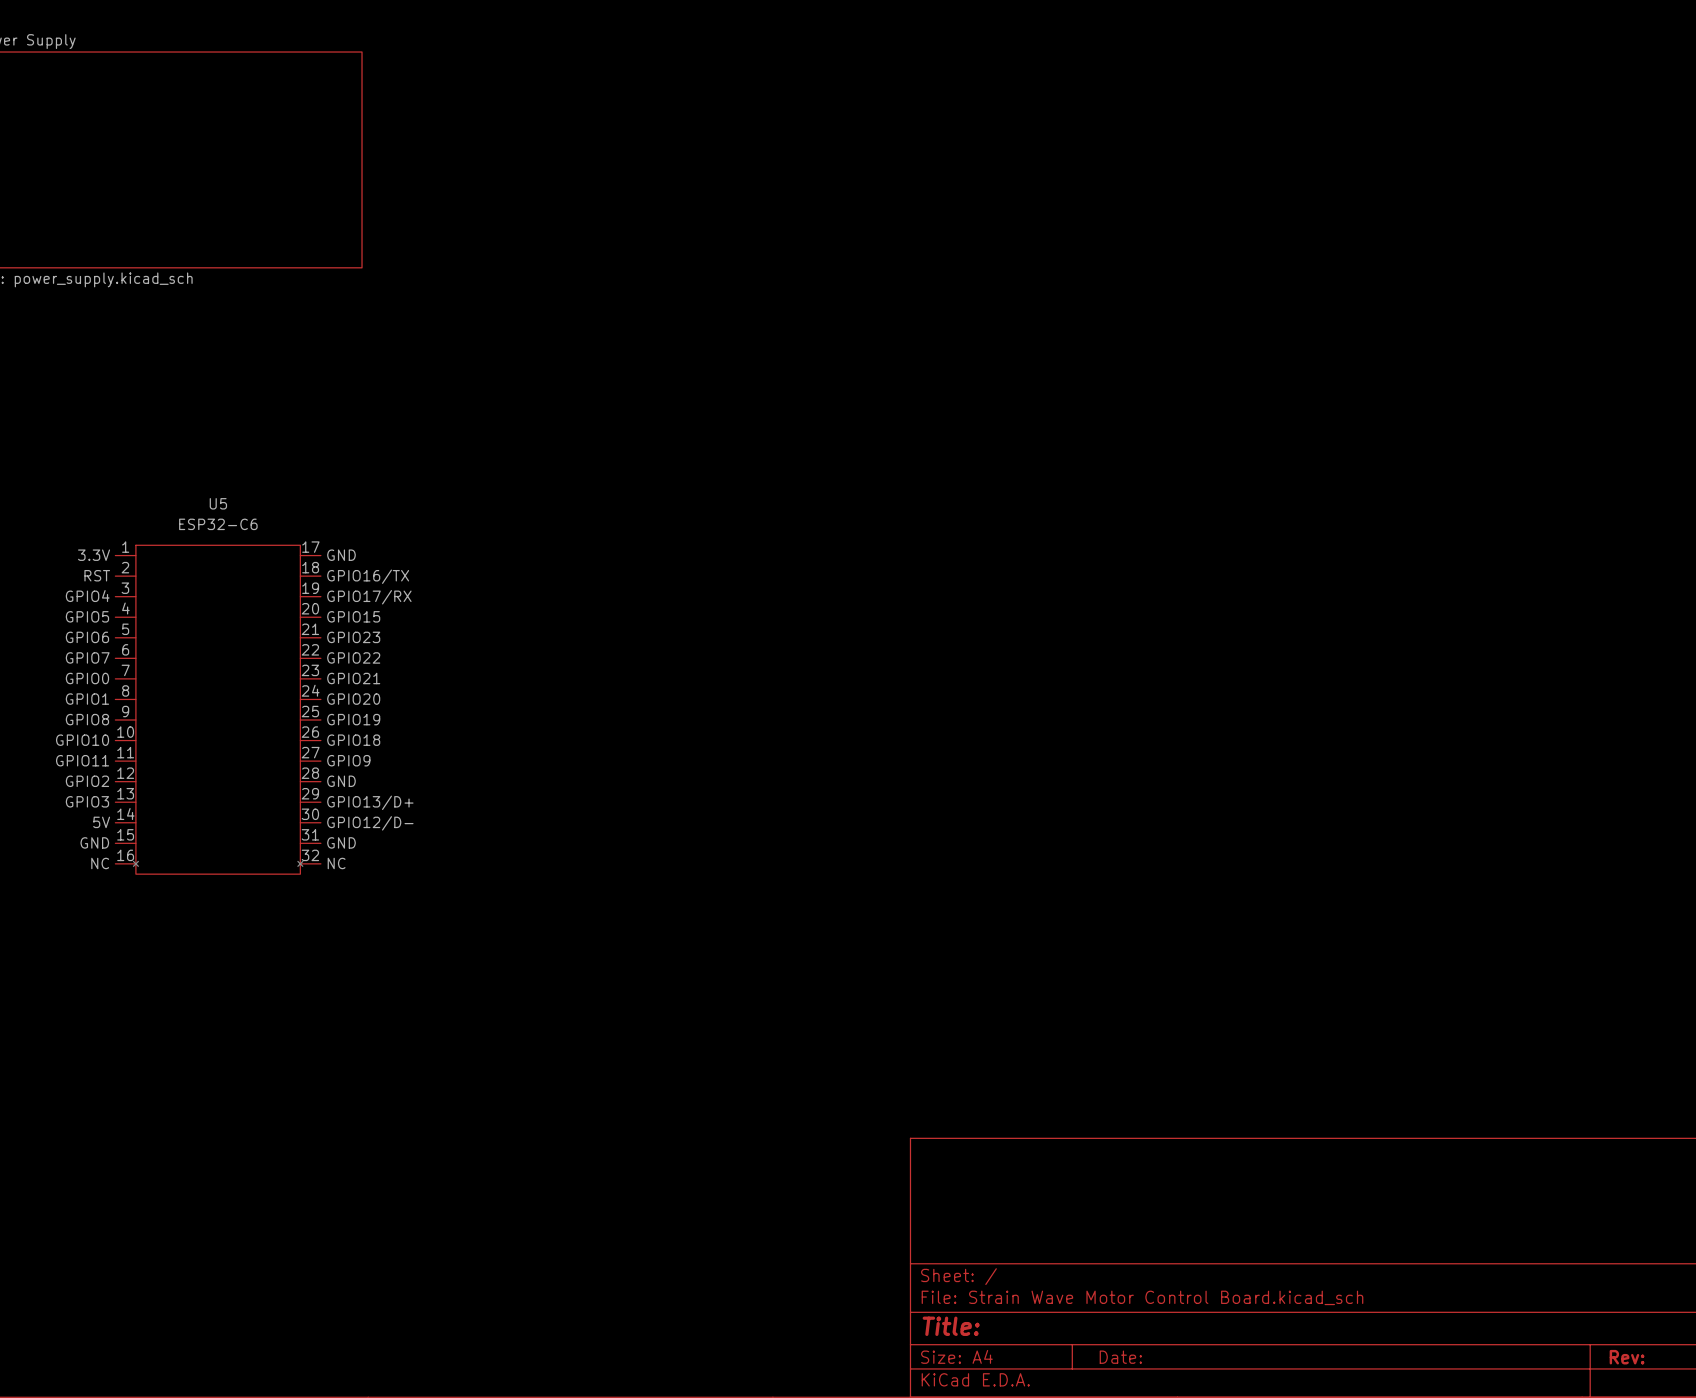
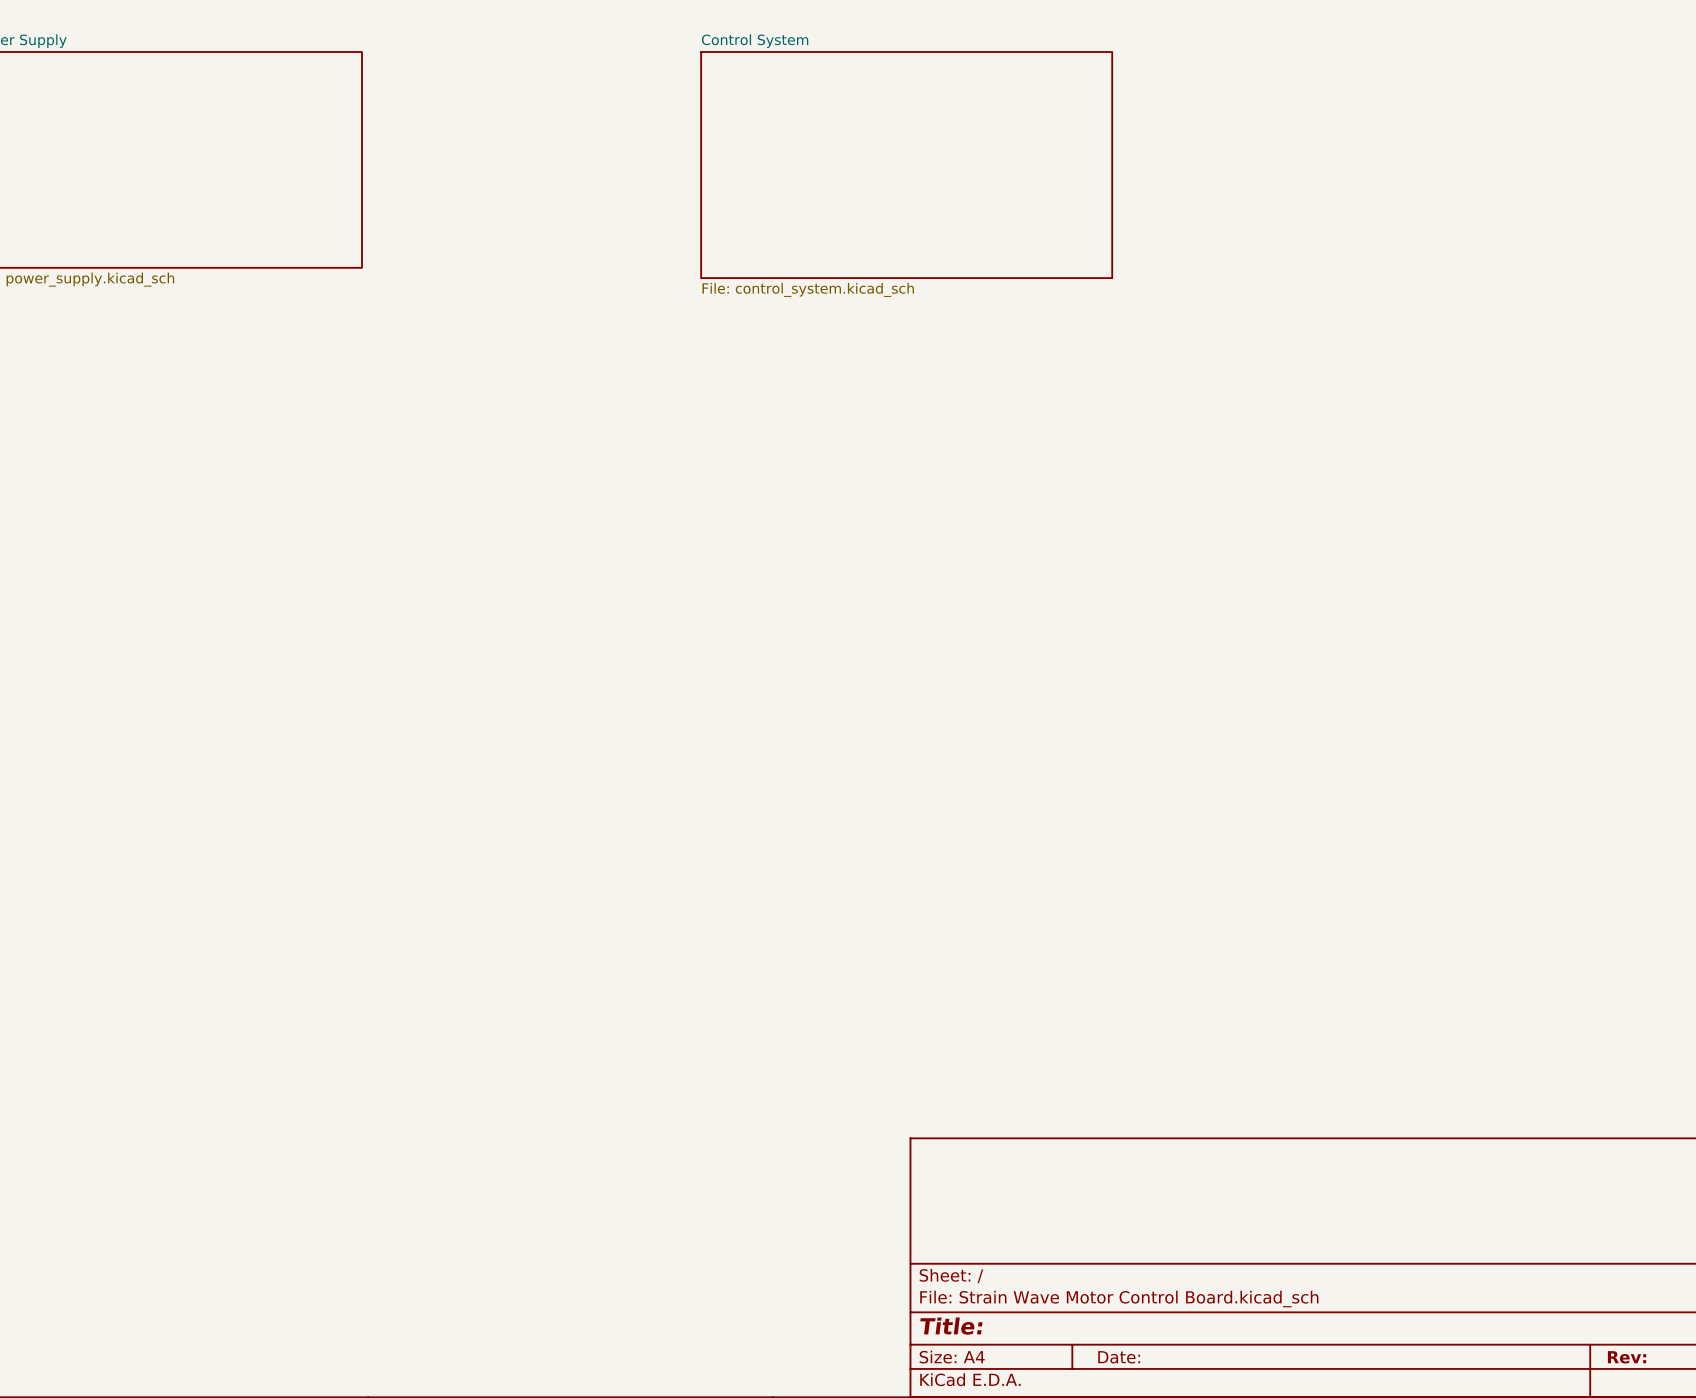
sheet Control System: none -> File: control_system.kicad_sch (906, 165)
U5: ESP32-C6 (218, 709) -> none

